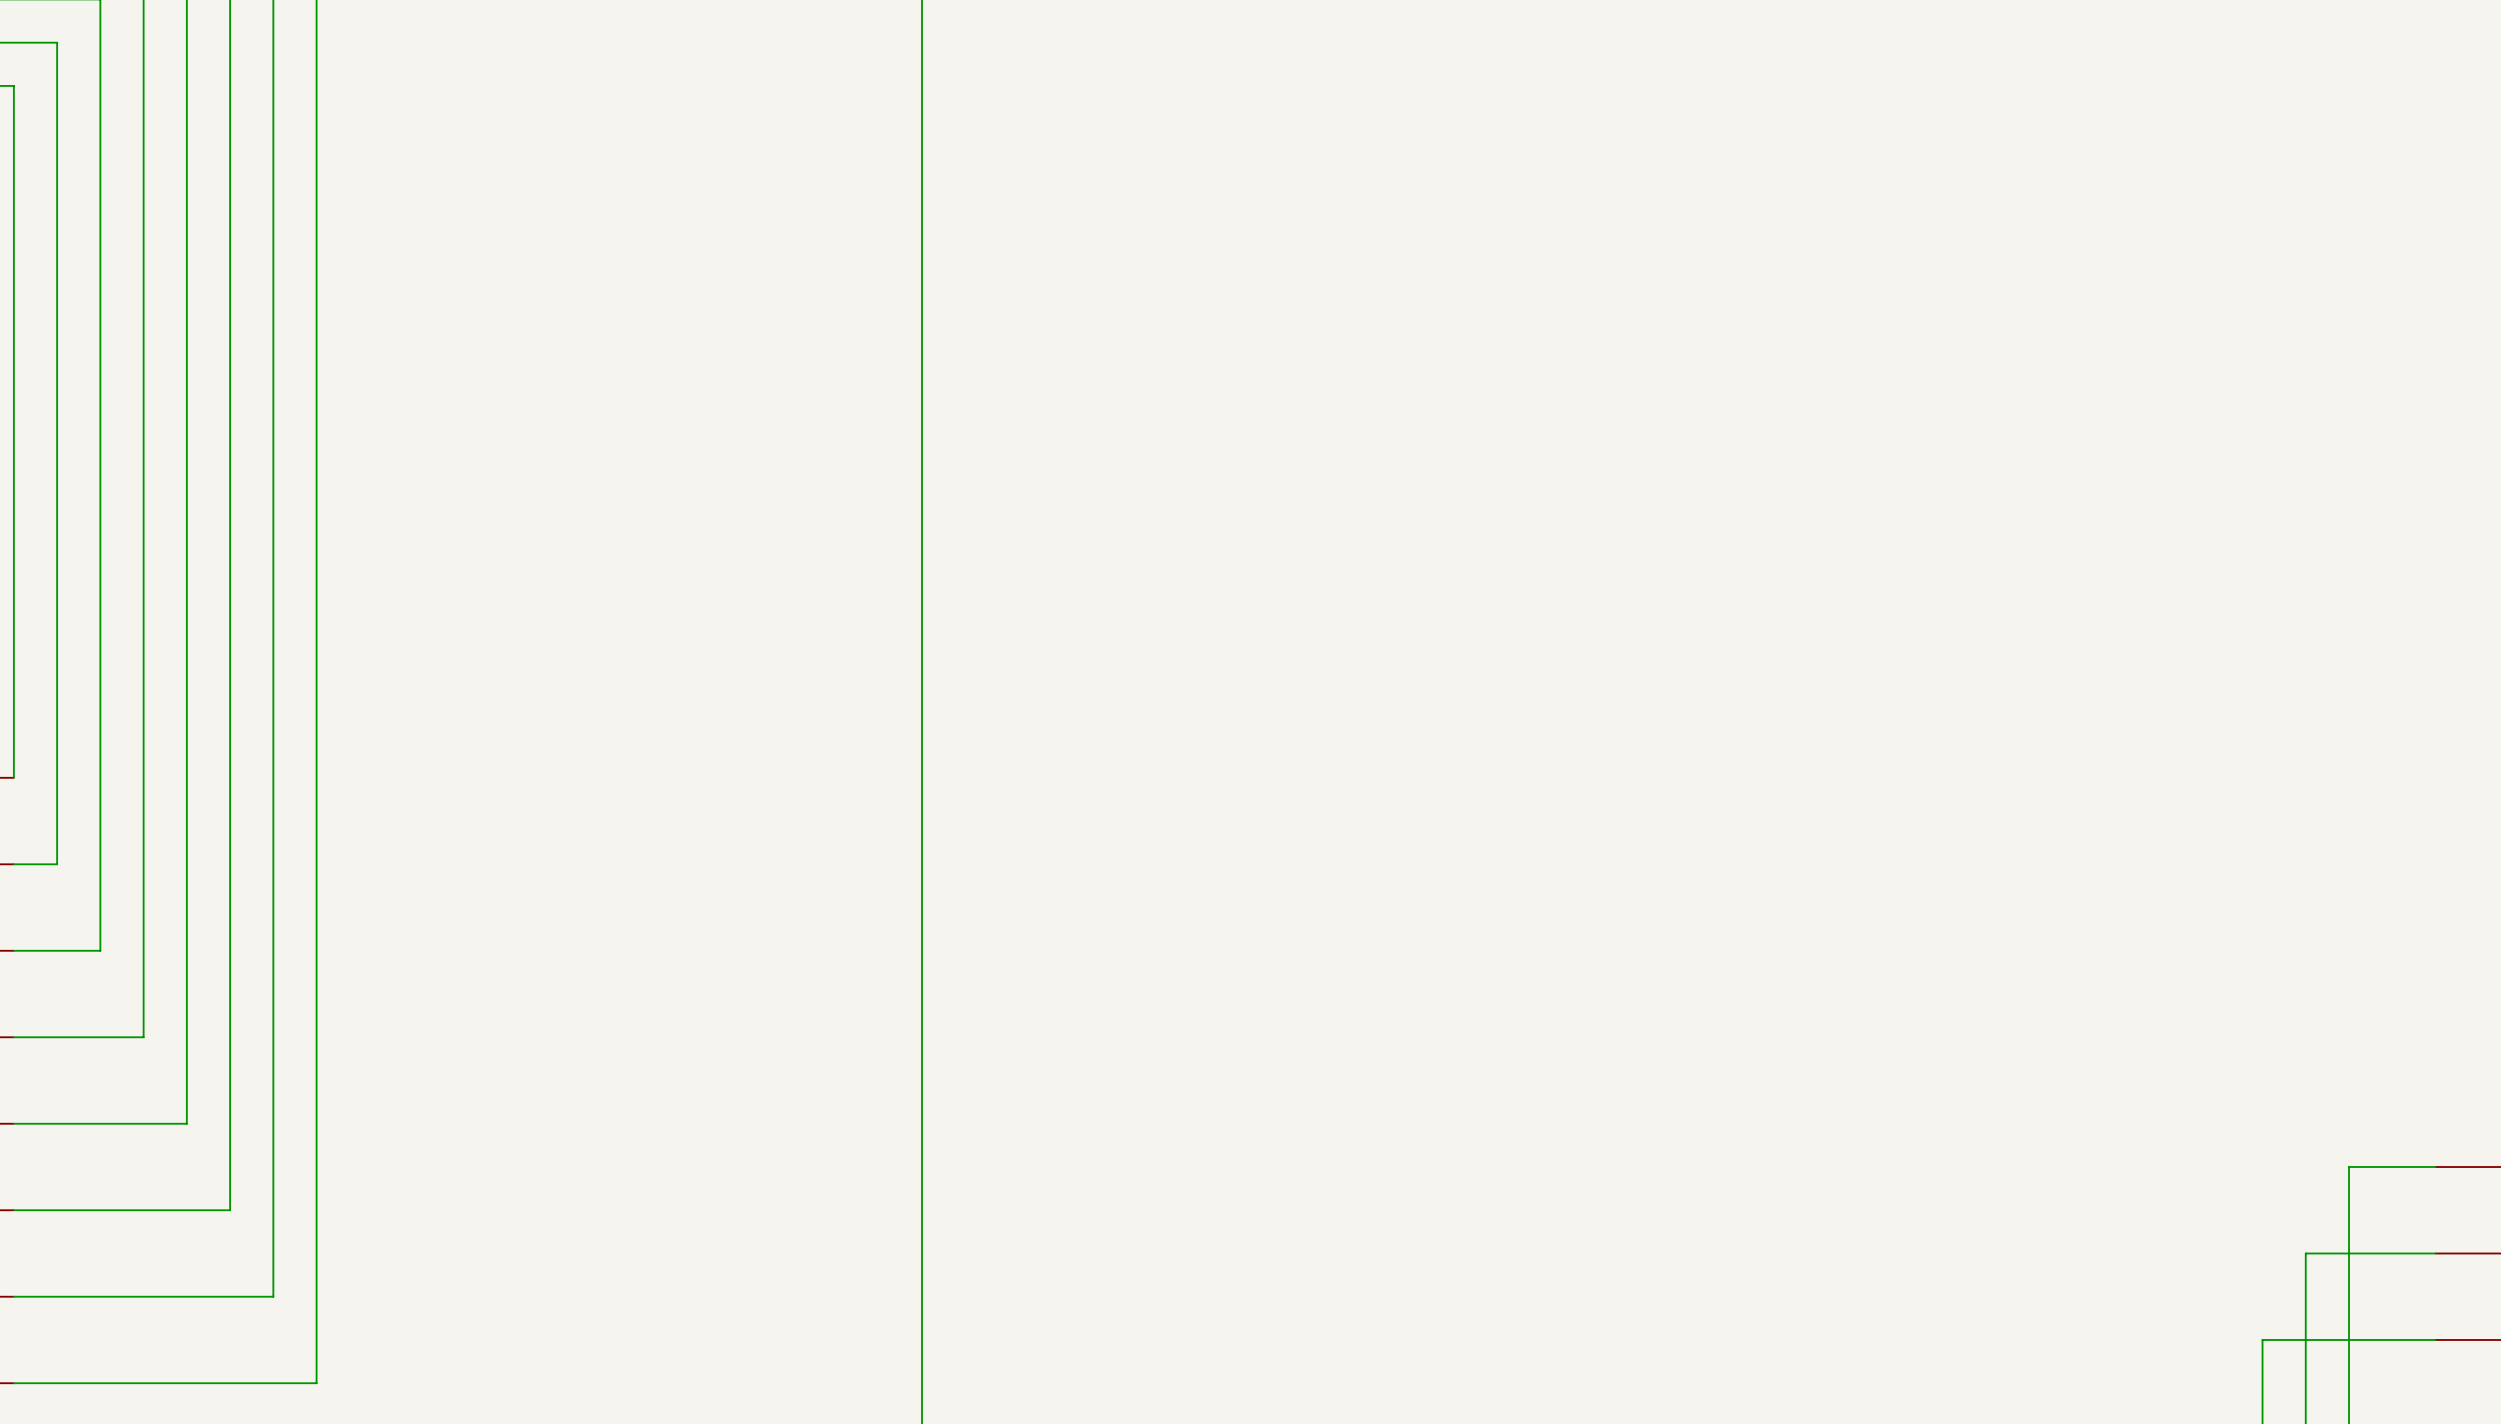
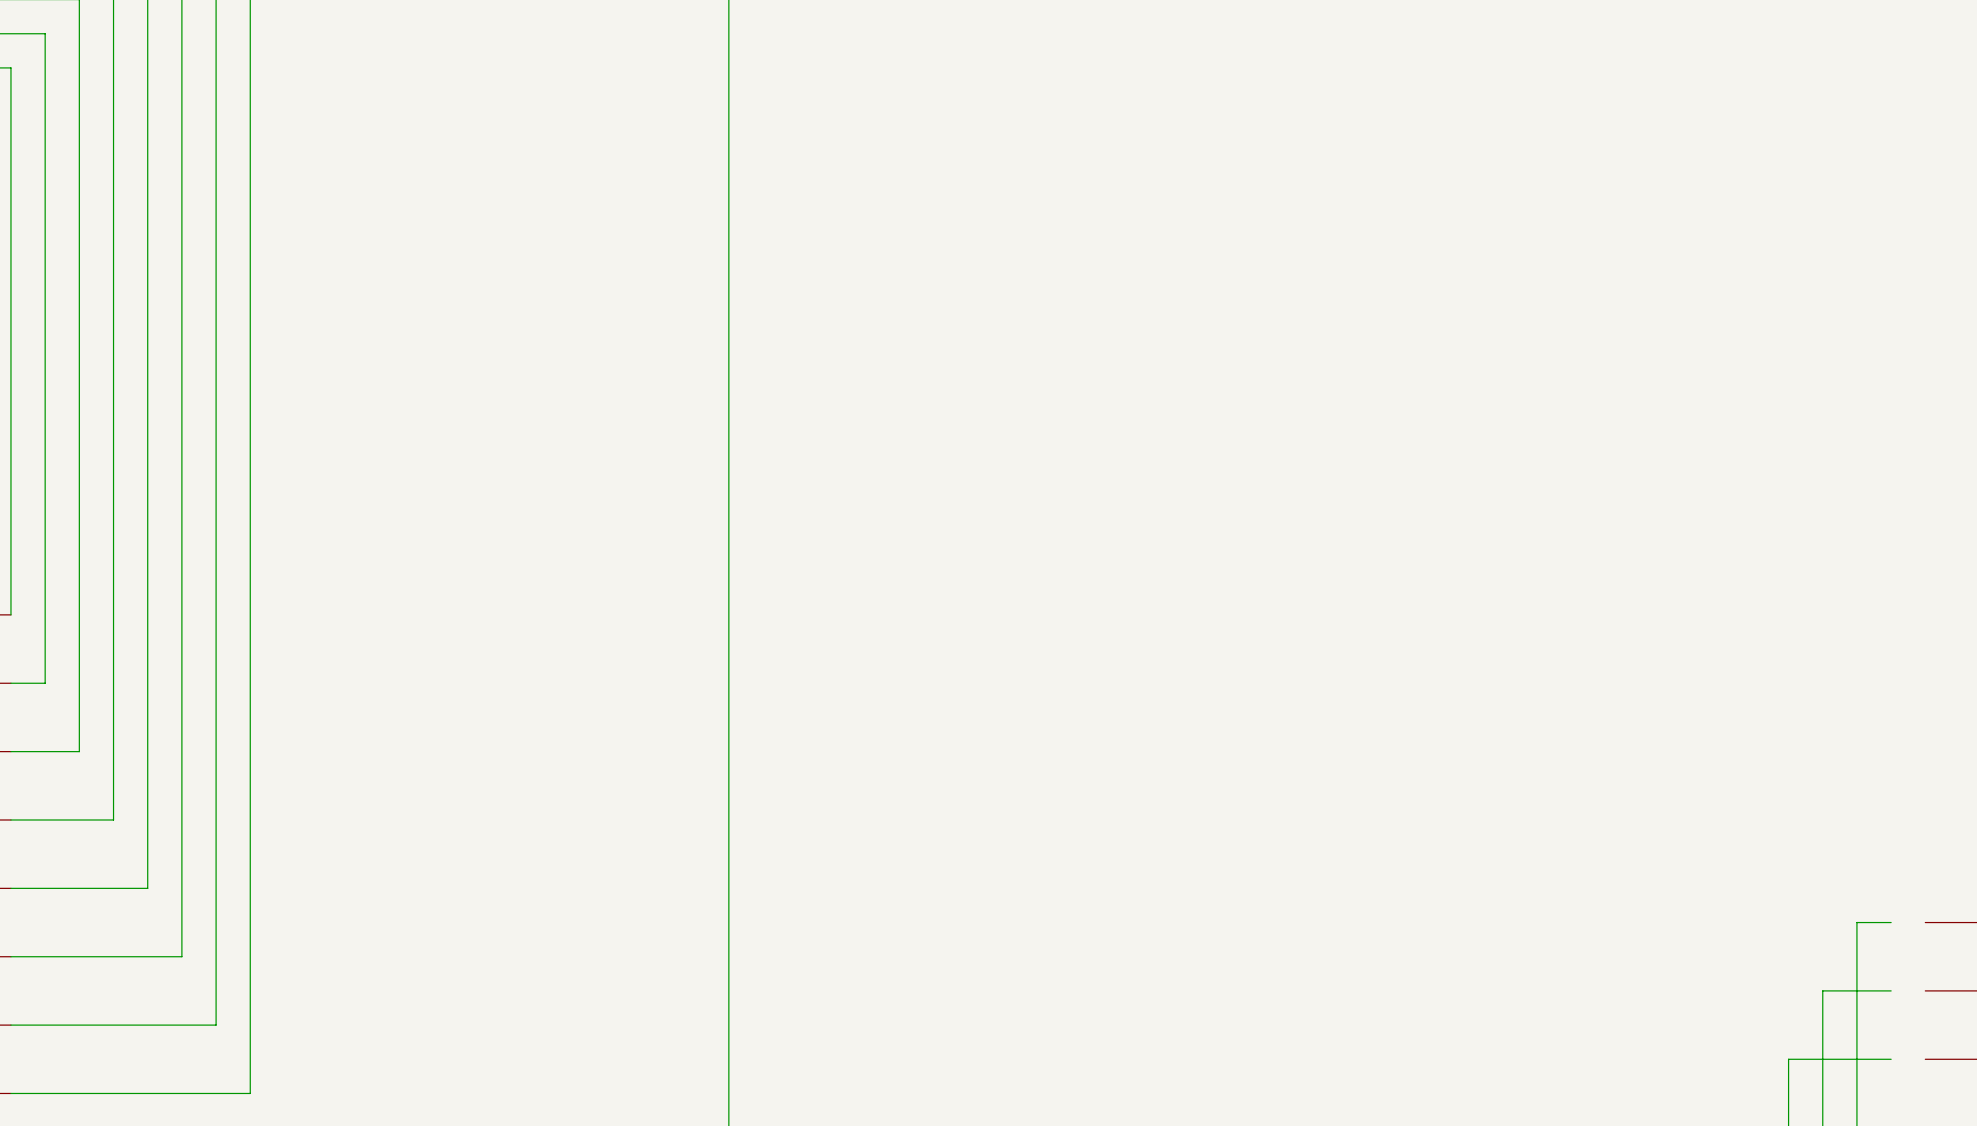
wire: (2392, 1167) (2435, 1167) -> none
wire: (2392, 1253) (2435, 1253) -> none
wire: (2392, 1339) (2435, 1339) -> none

